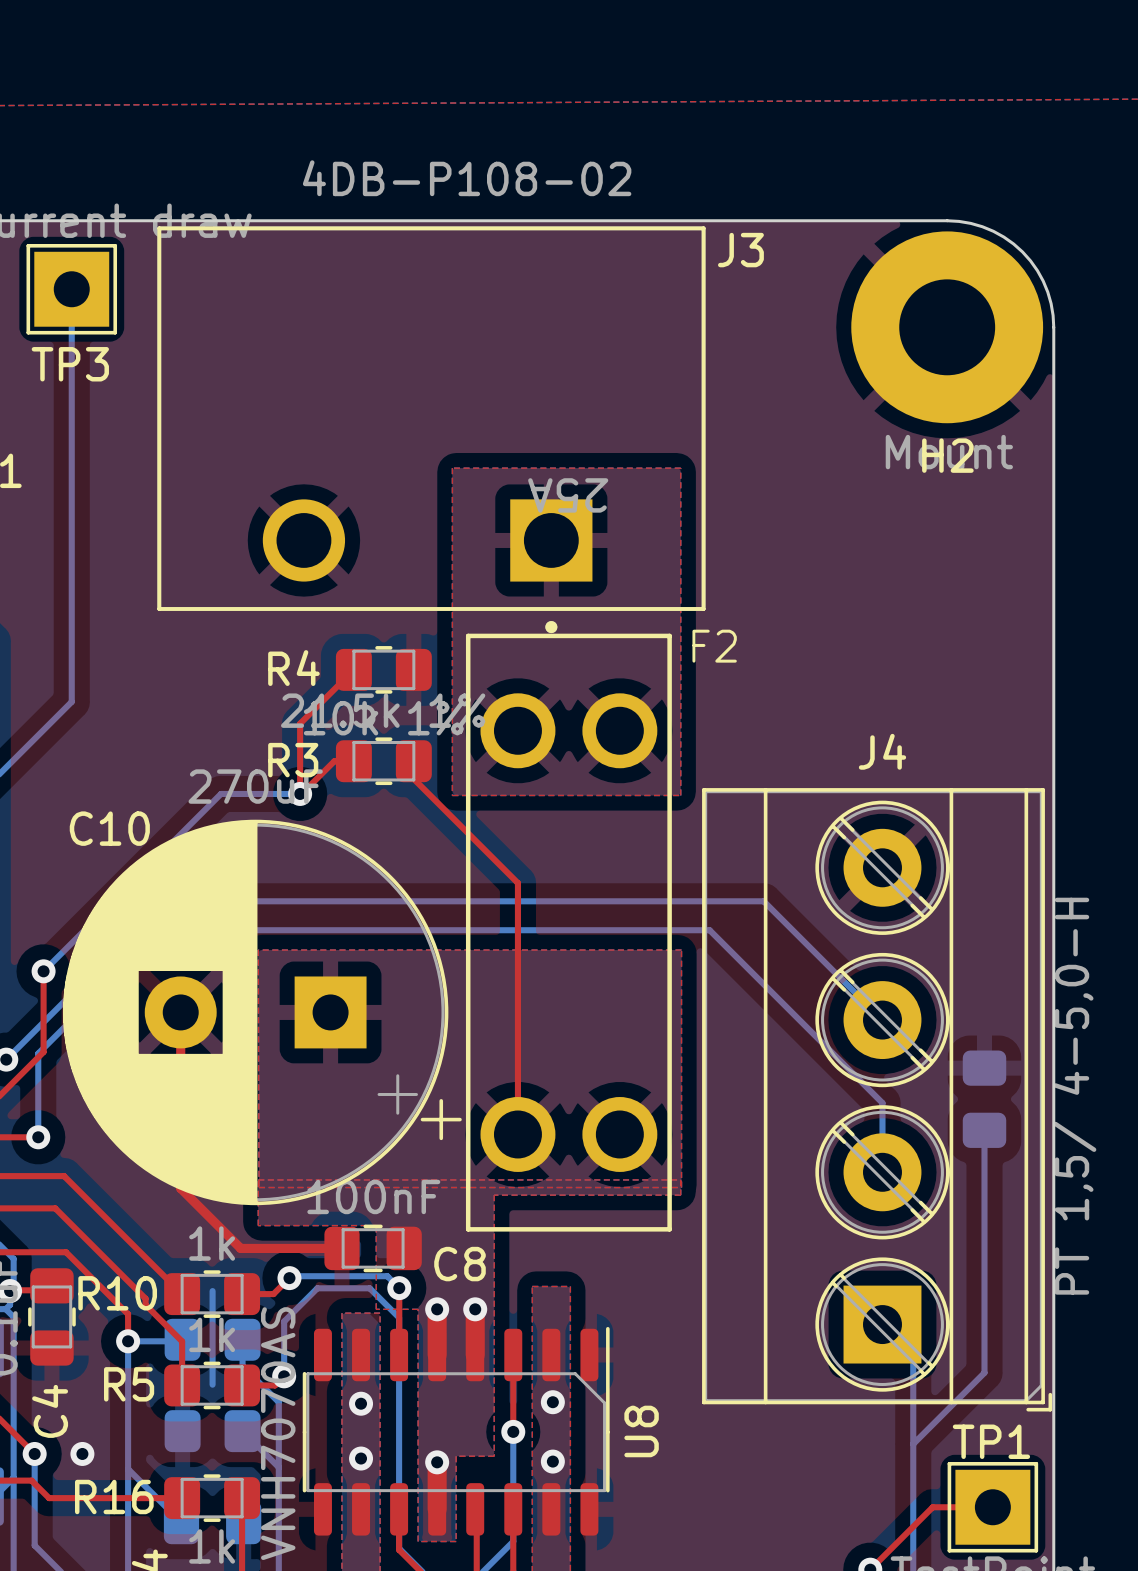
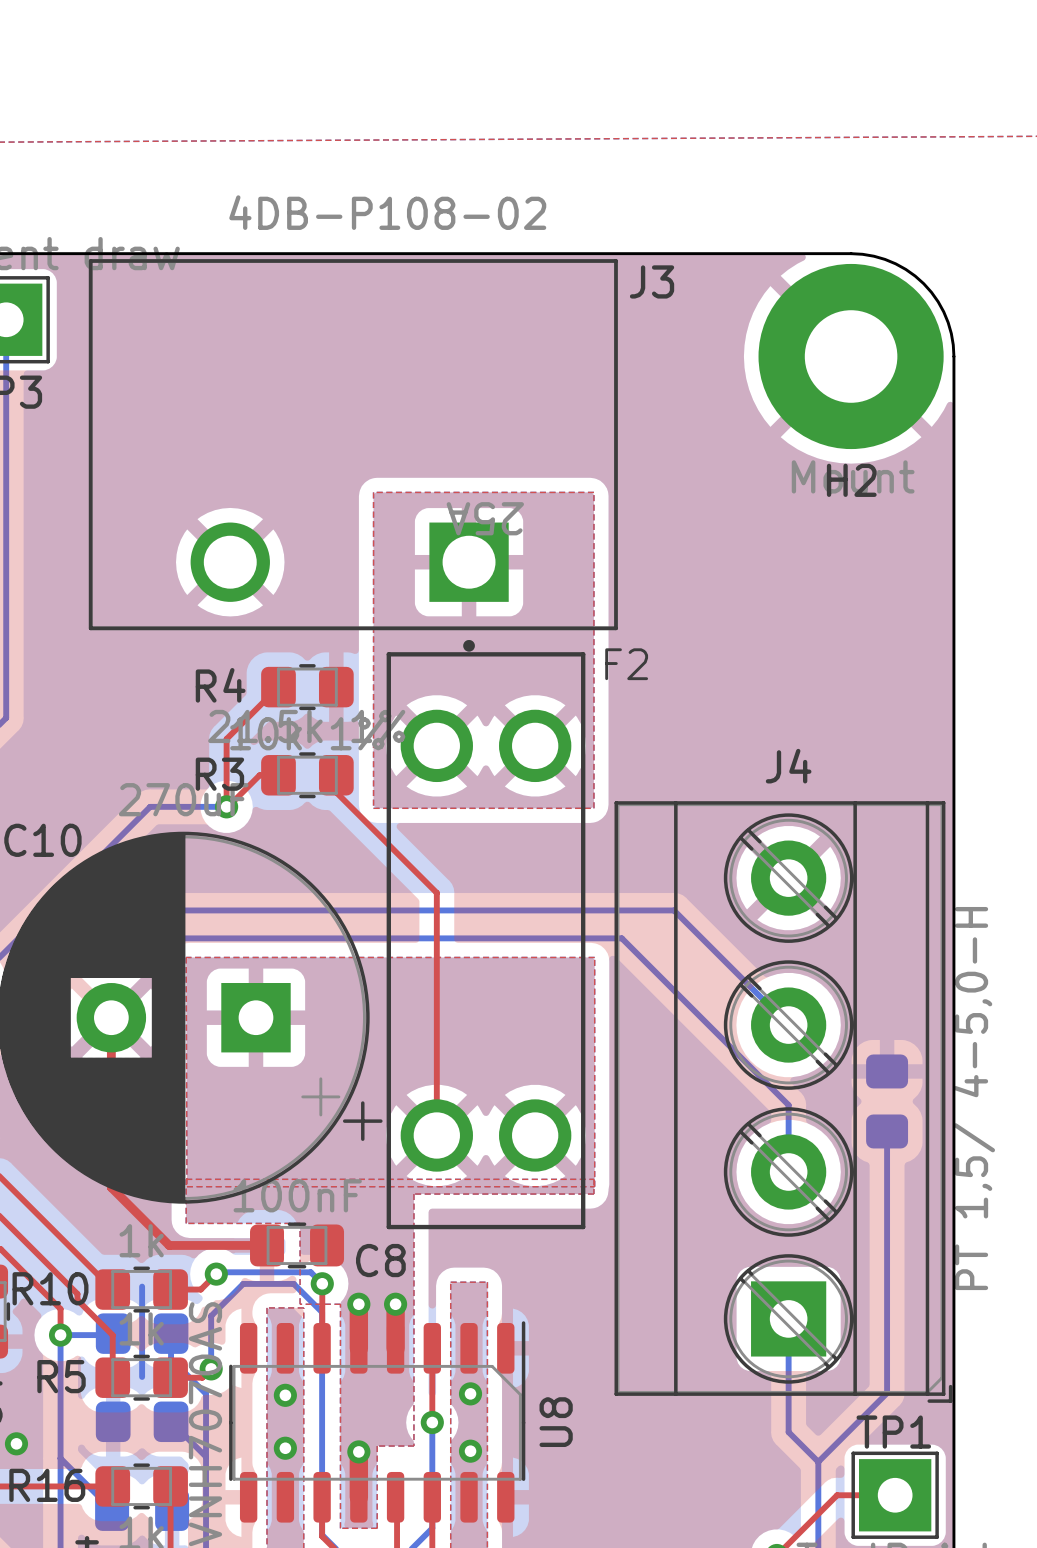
bottom track: (882, 1324) (913, 1355) (913, 1472) -> (788, 1318) (788, 1432) (818, 1461) (887, 1393) (887, 1365)
bottom track: (984, 1372) (913, 1444) -> none

